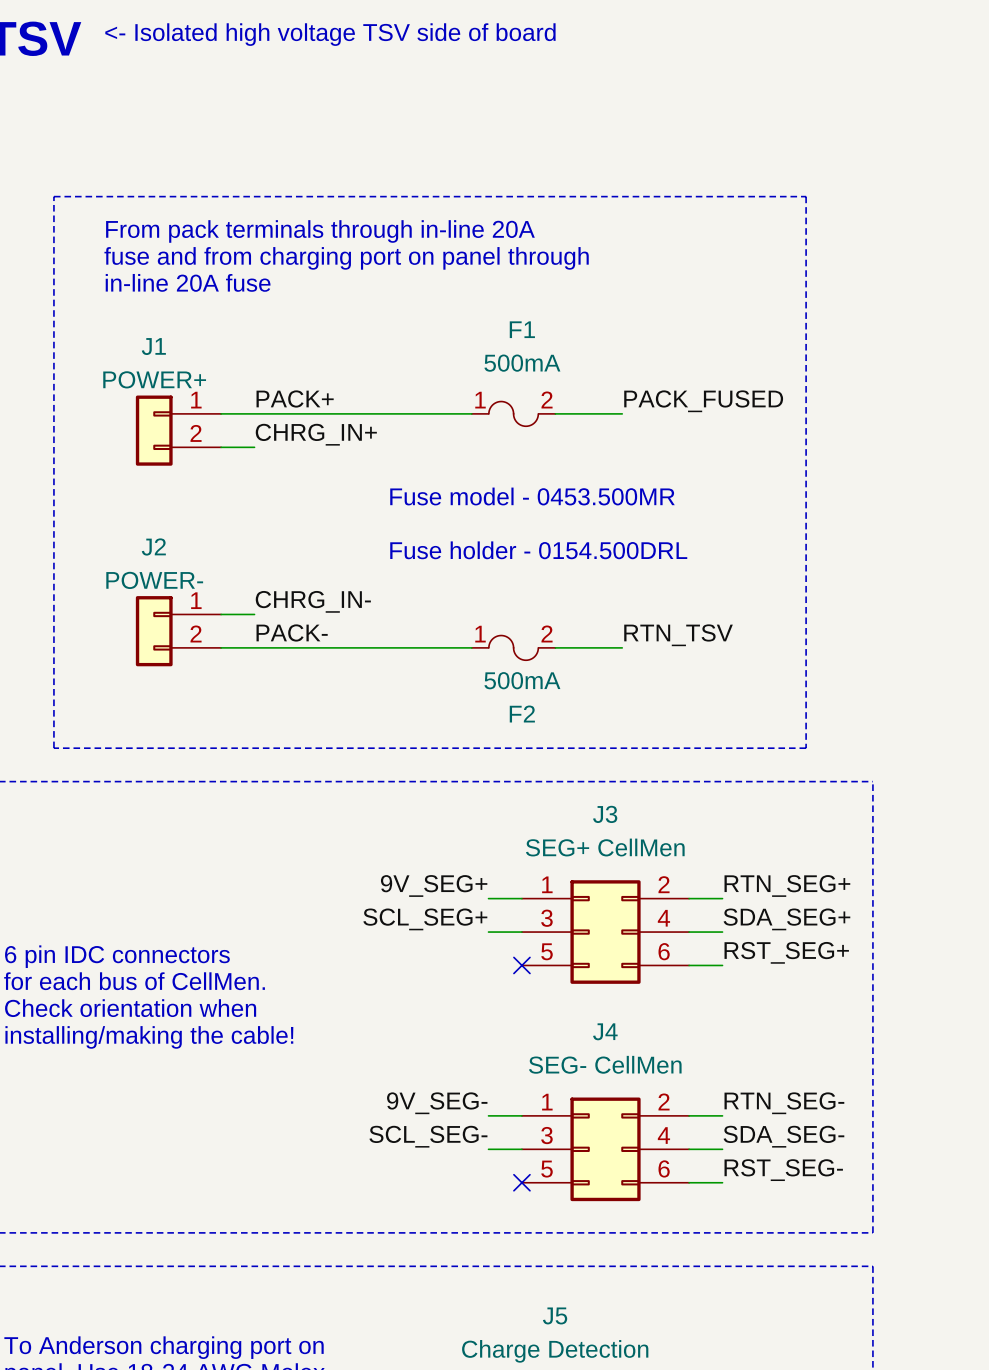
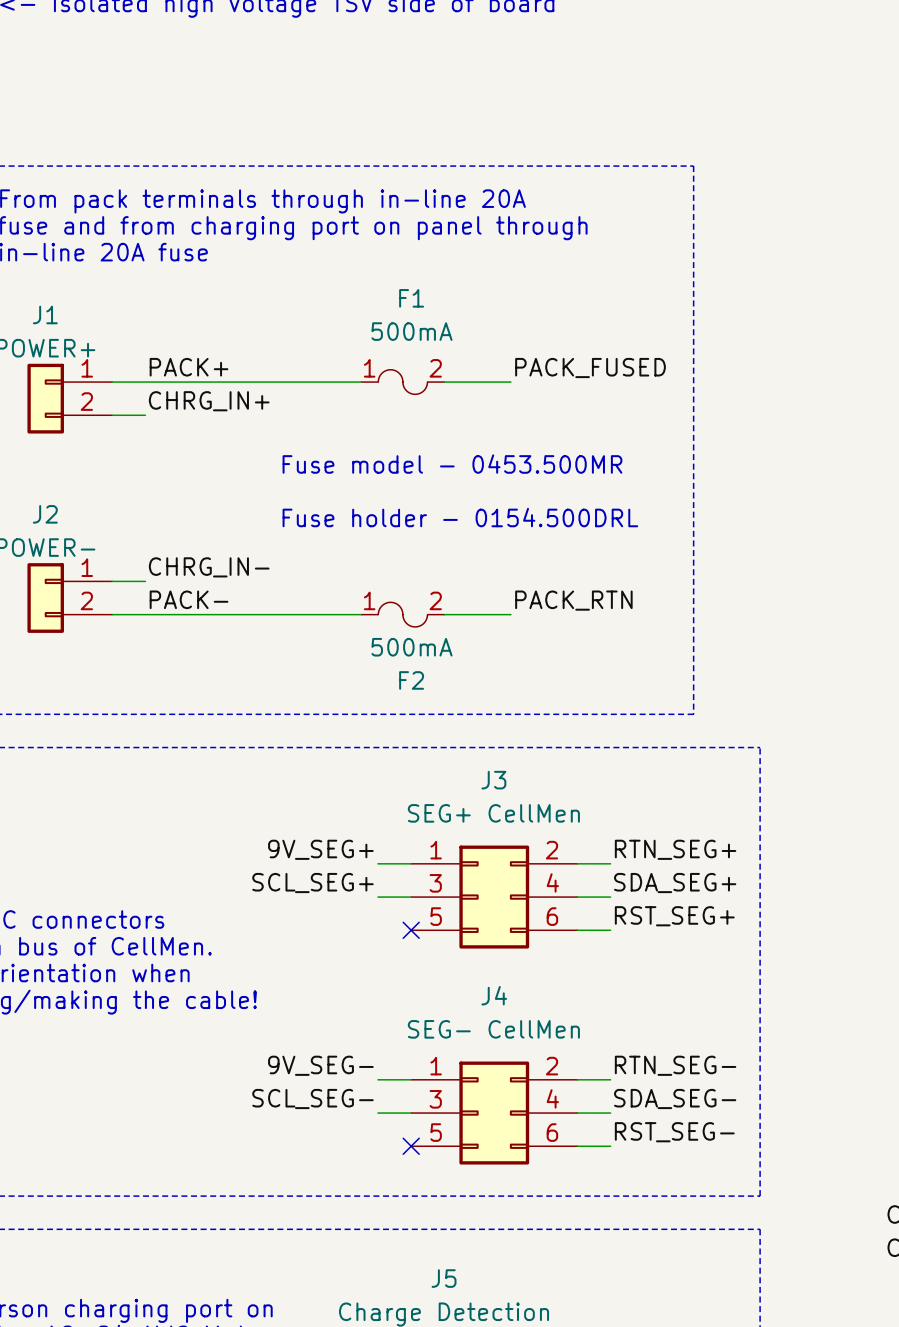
label: RTN_TSV (678, 635) -> PACK_RTN (573, 600)

